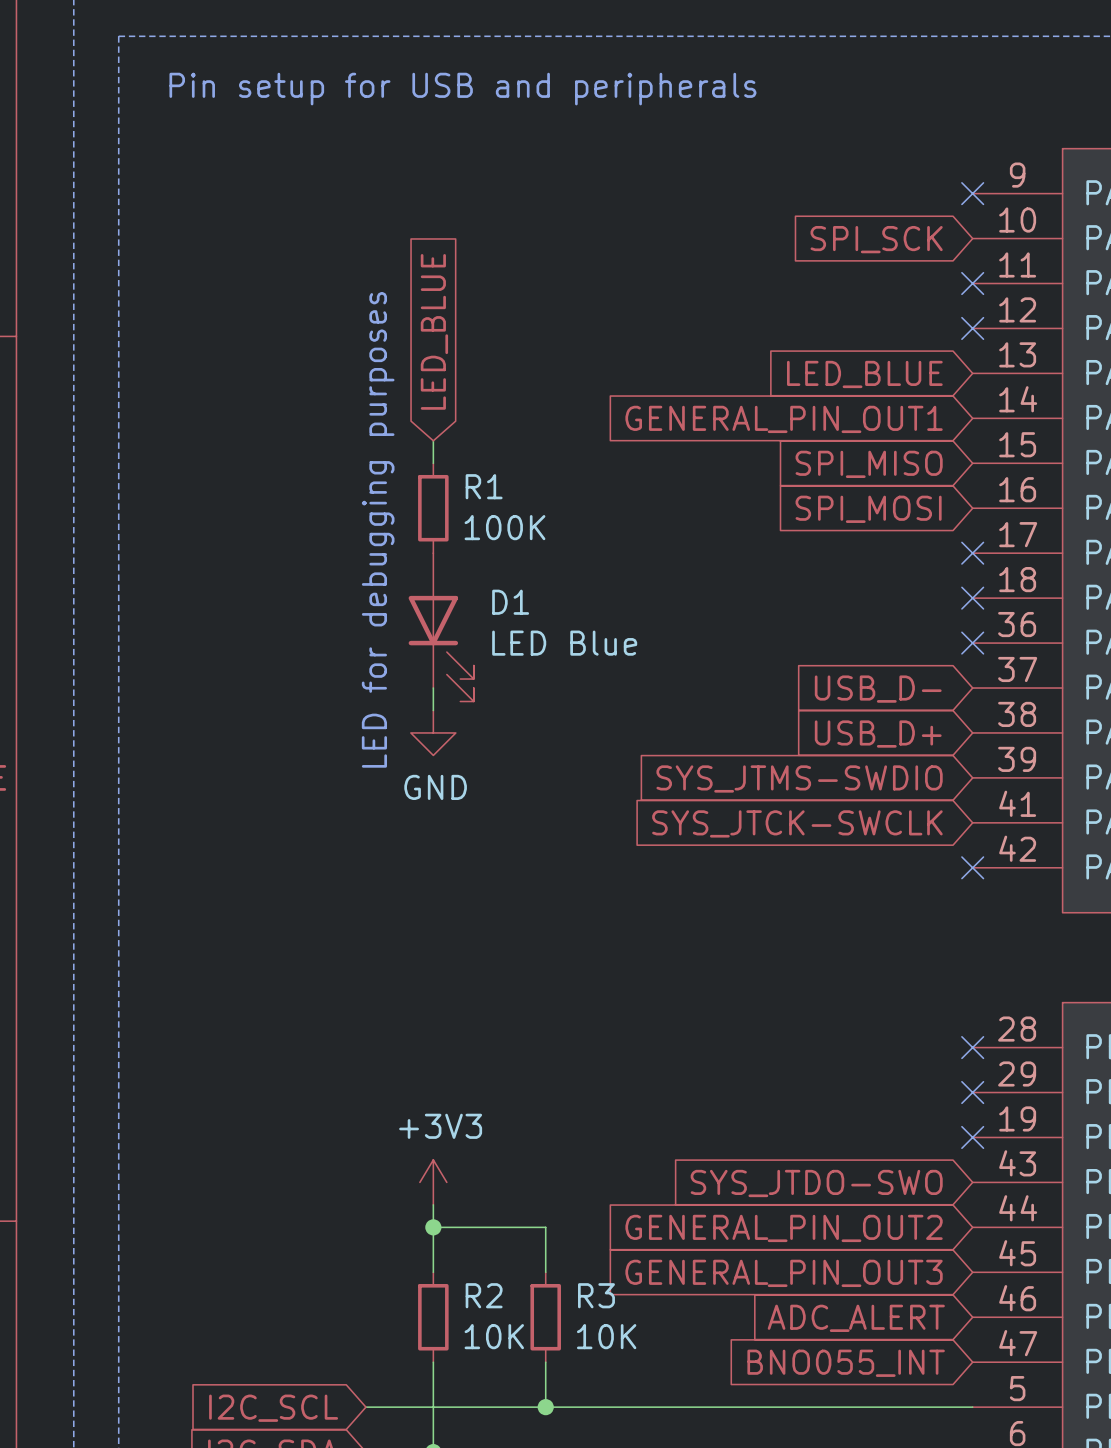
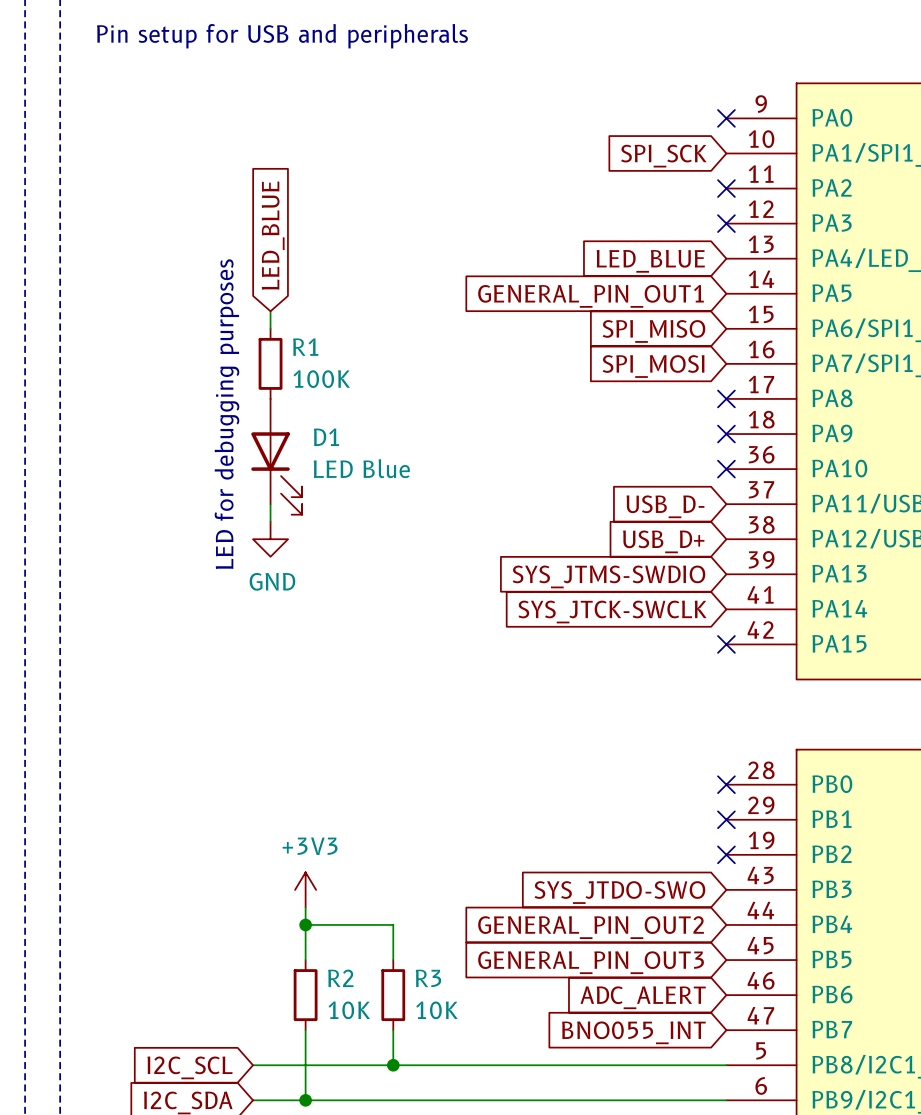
global label position: LED_BLUE (434, 331) -> LED_BLUE (273, 235)
wire: (433, 440) (433, 463) -> (270, 311) (270, 328)
R1 position: (433, 508) -> (270, 363)
text position: LED for debugging purposes (378, 529) -> LED for debugging purposes (226, 414)
D1 position: (441, 627) -> (276, 456)
wire: (433, 688) (433, 710) -> (270, 504) (270, 521)
power symbol position: GND (433, 732) -> GND (270, 539)

